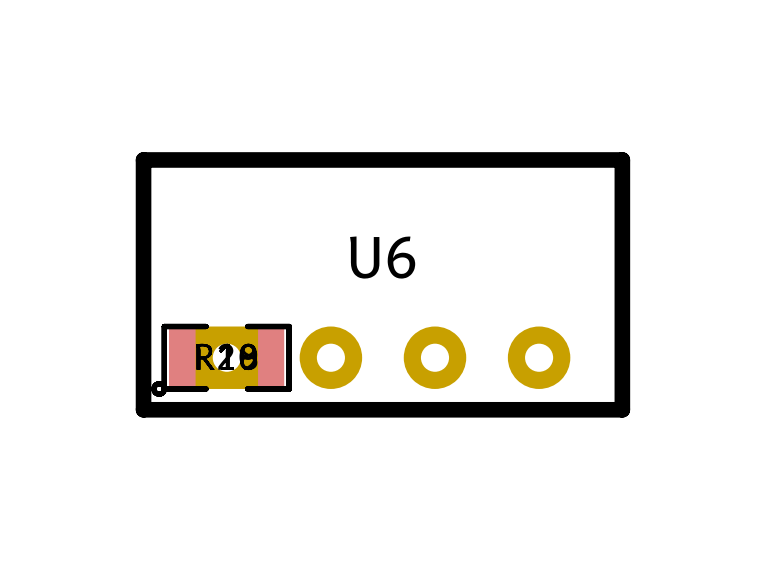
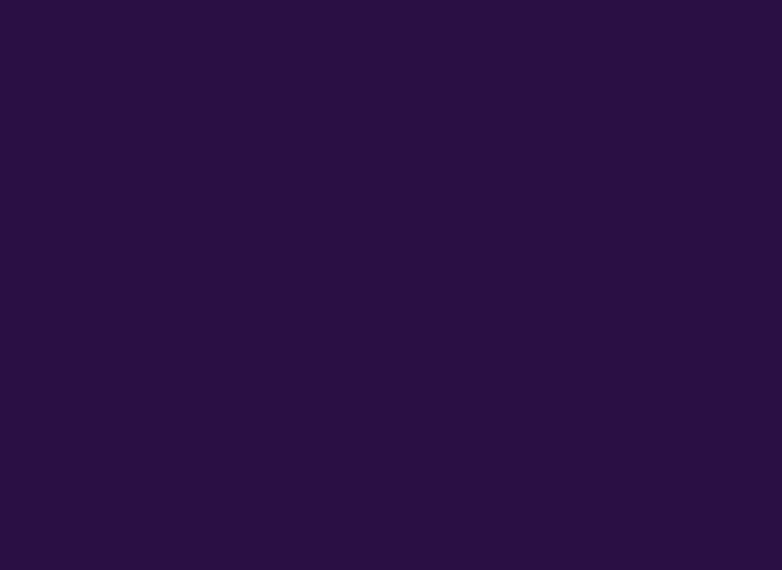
U6: (382, 284) -> none
part: (221, 360) -> none
part: (221, 360) -> none
part: (221, 360) -> none

